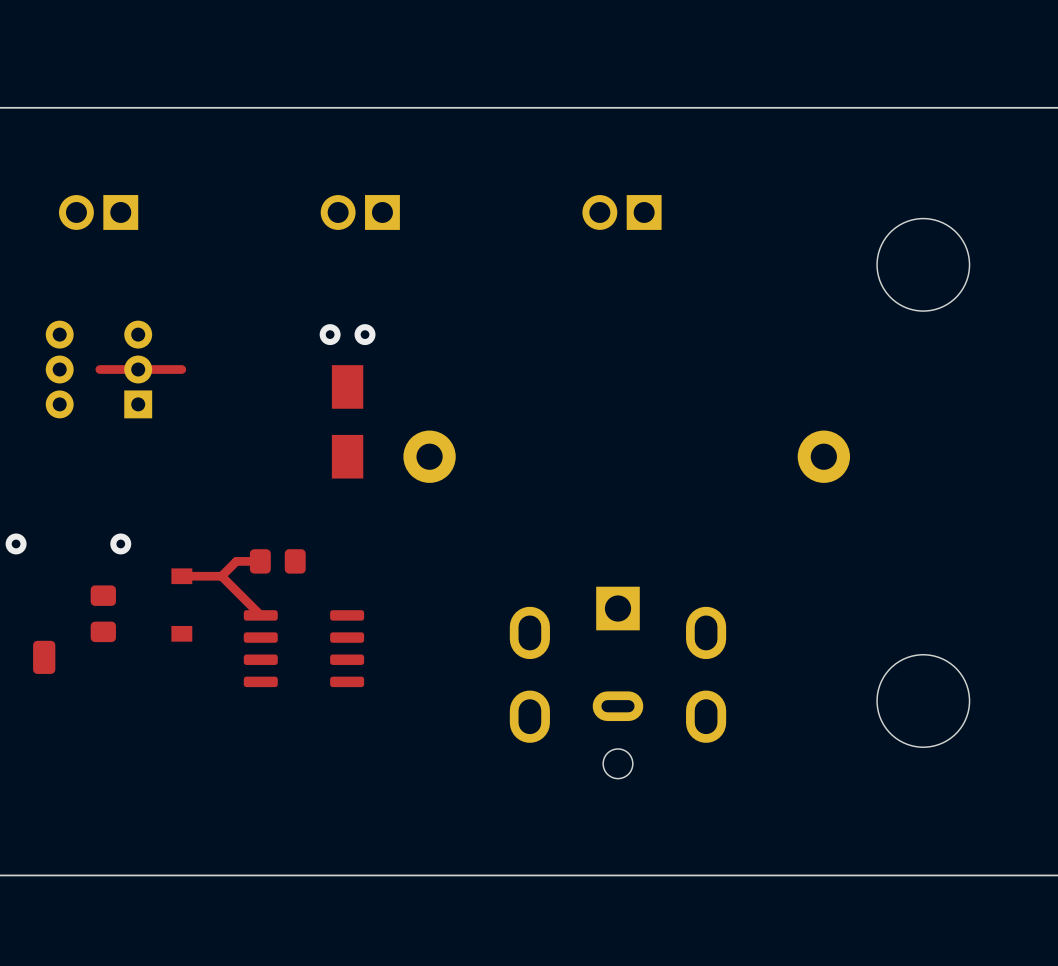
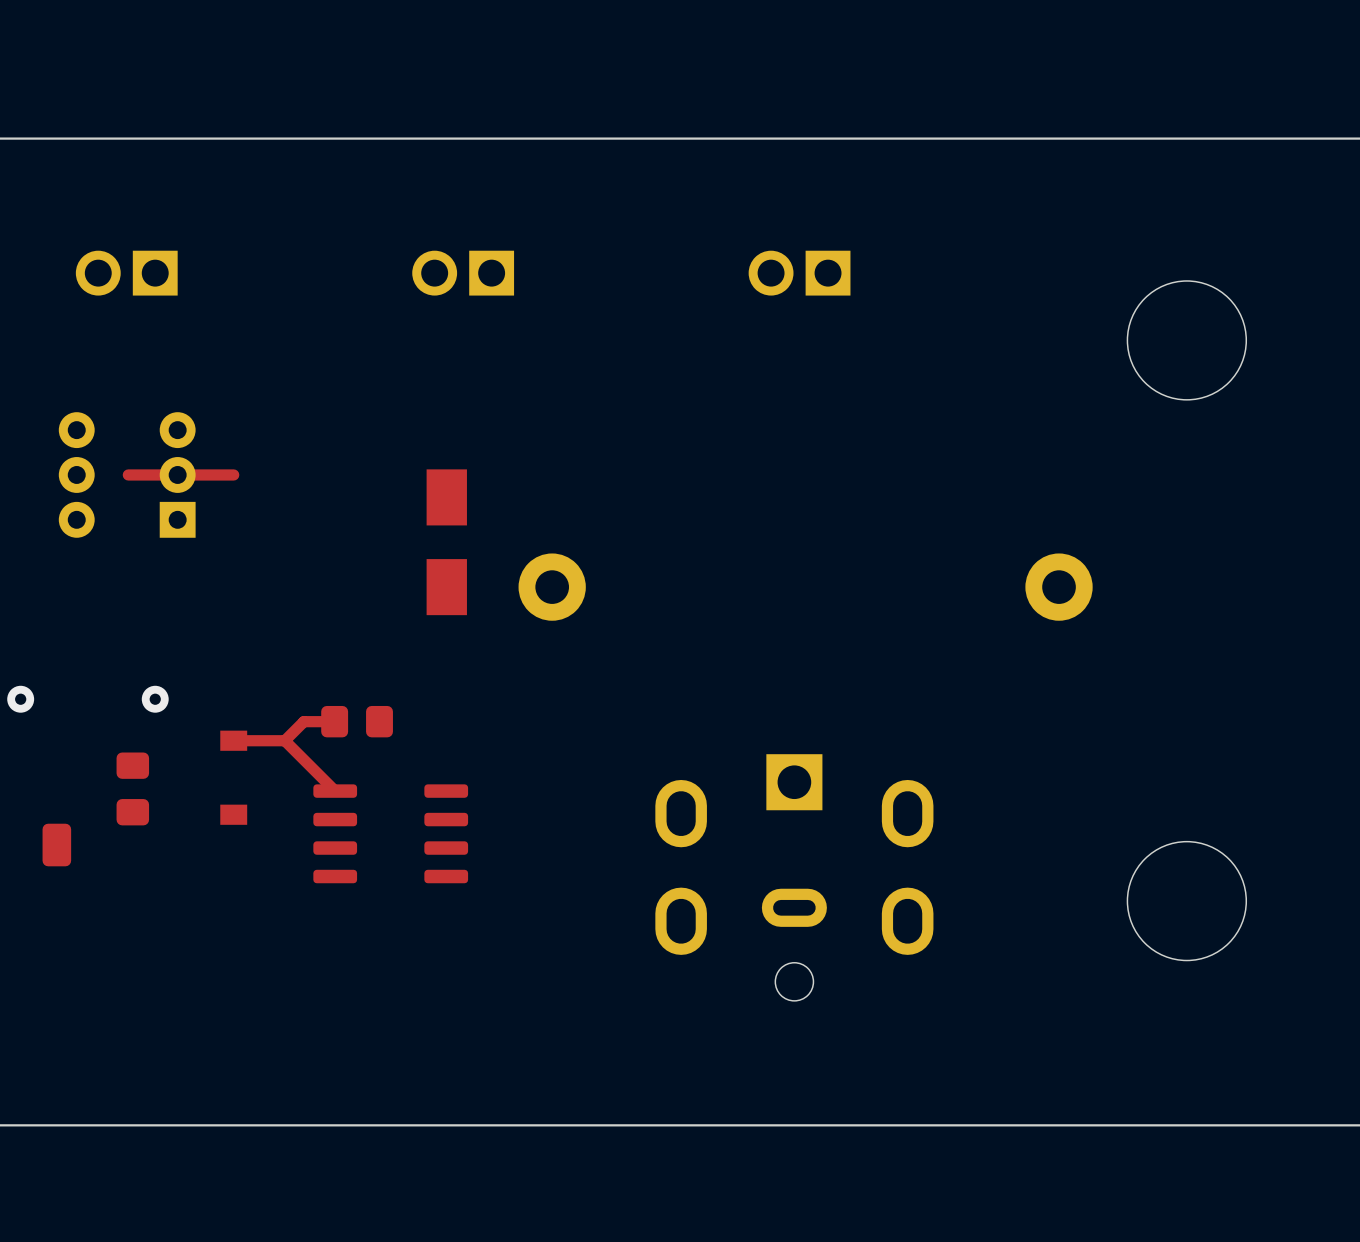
via: (330, 334) -> none
via: (365, 334) -> none

